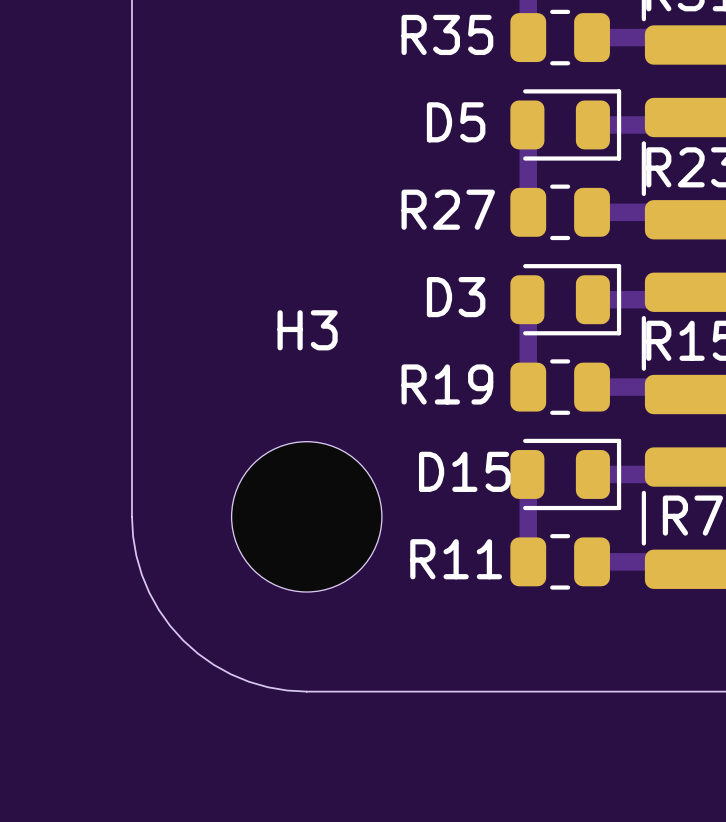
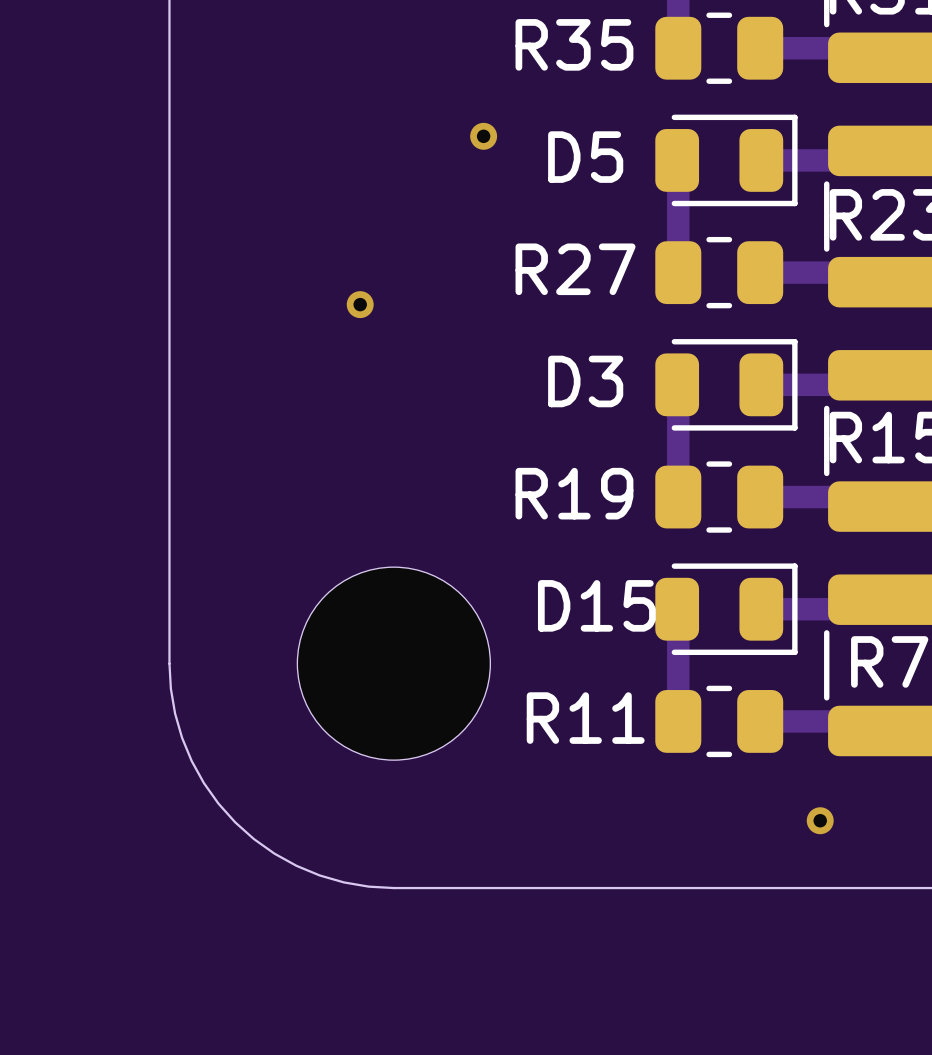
via: none -> (483, 136)
via: none -> (360, 304)
H3 name: H3 (307, 330) -> none
via: none -> (820, 820)

